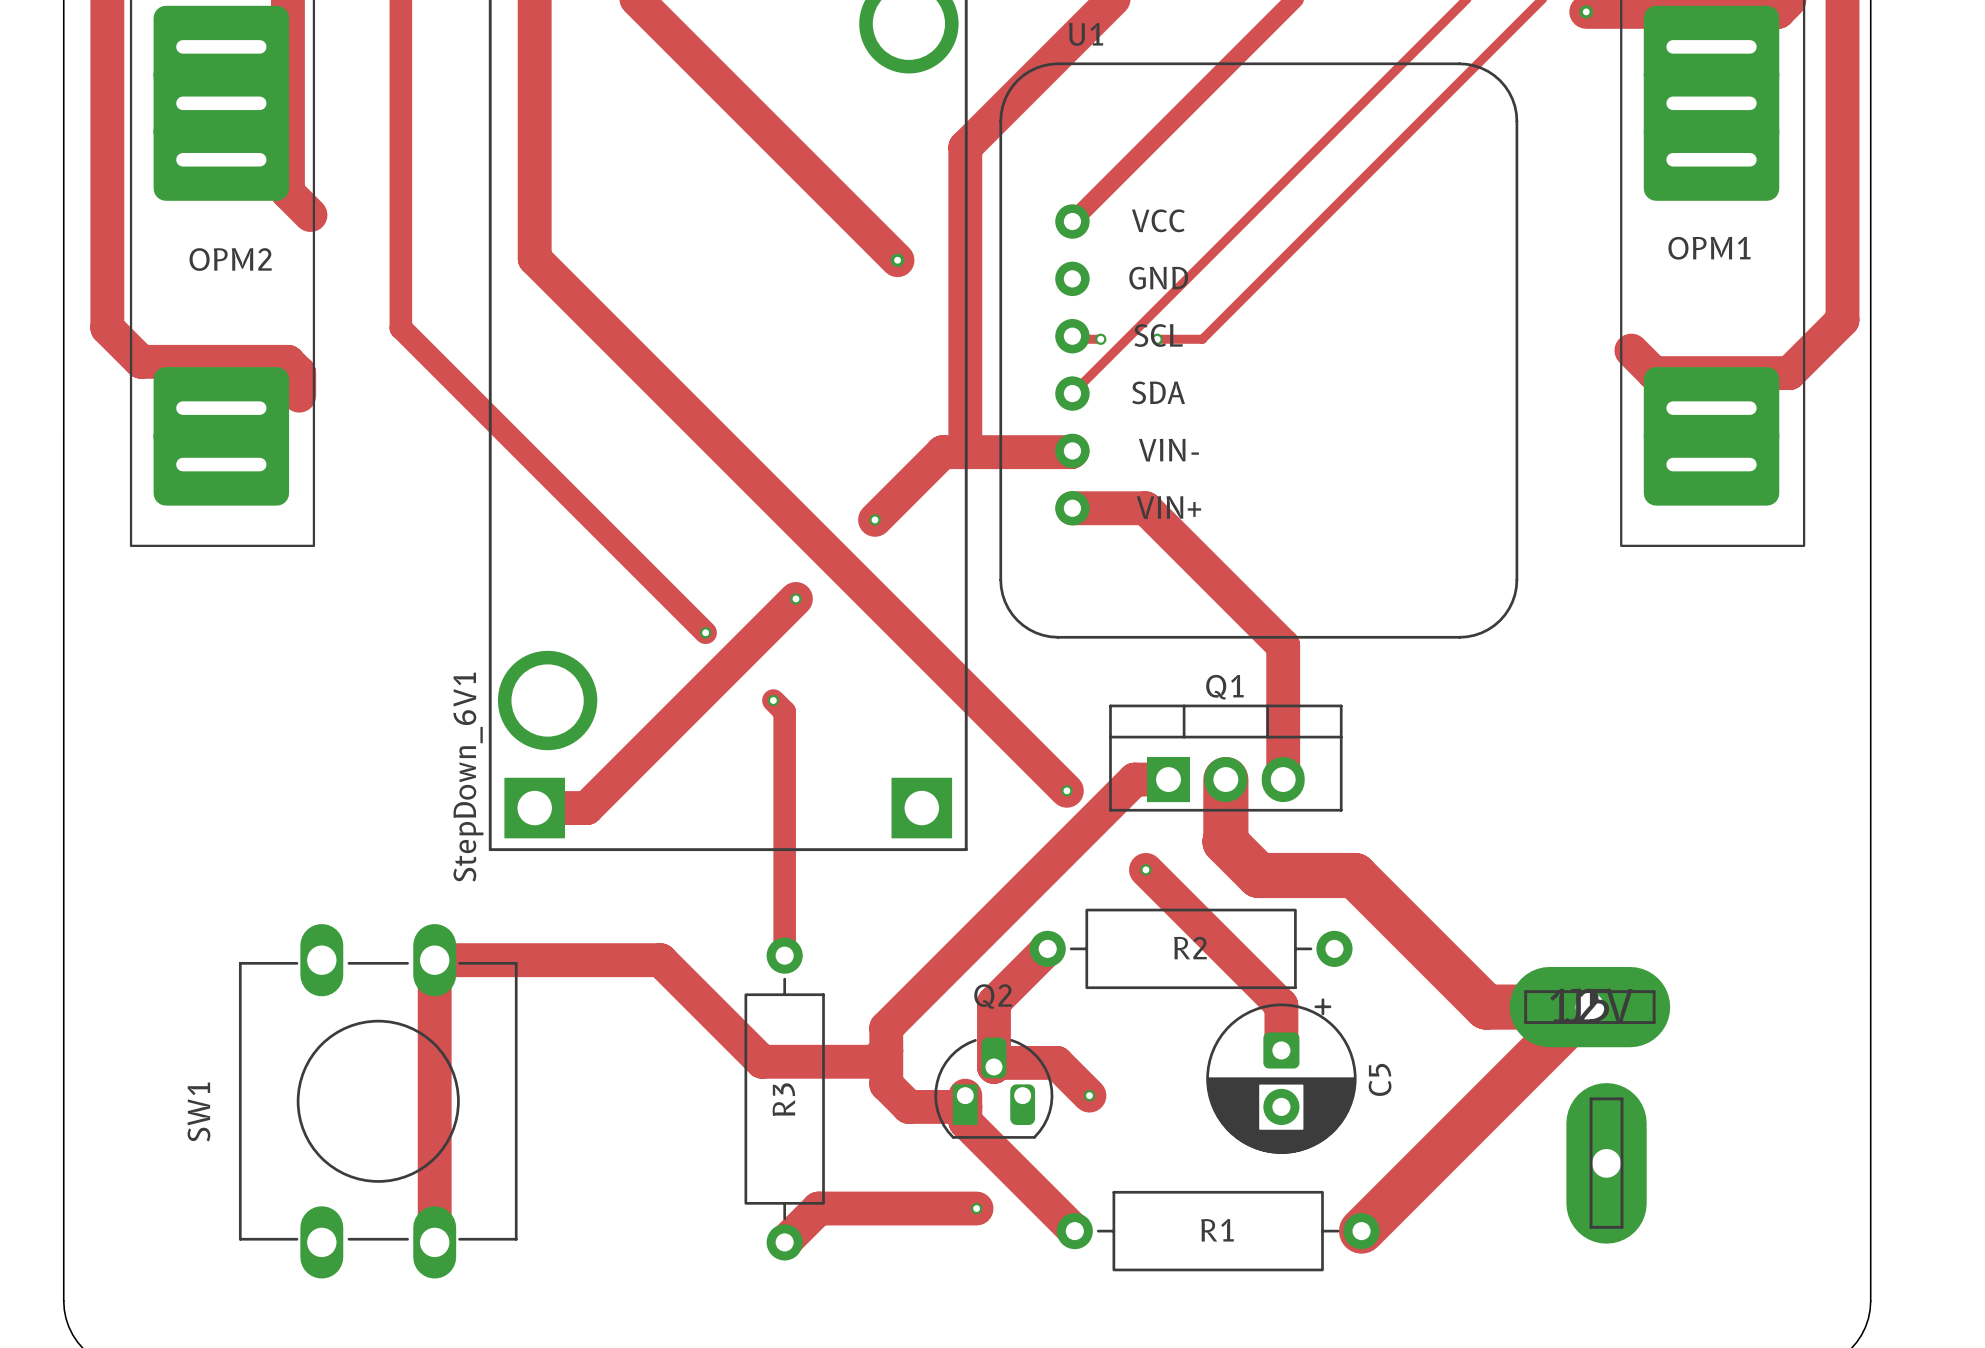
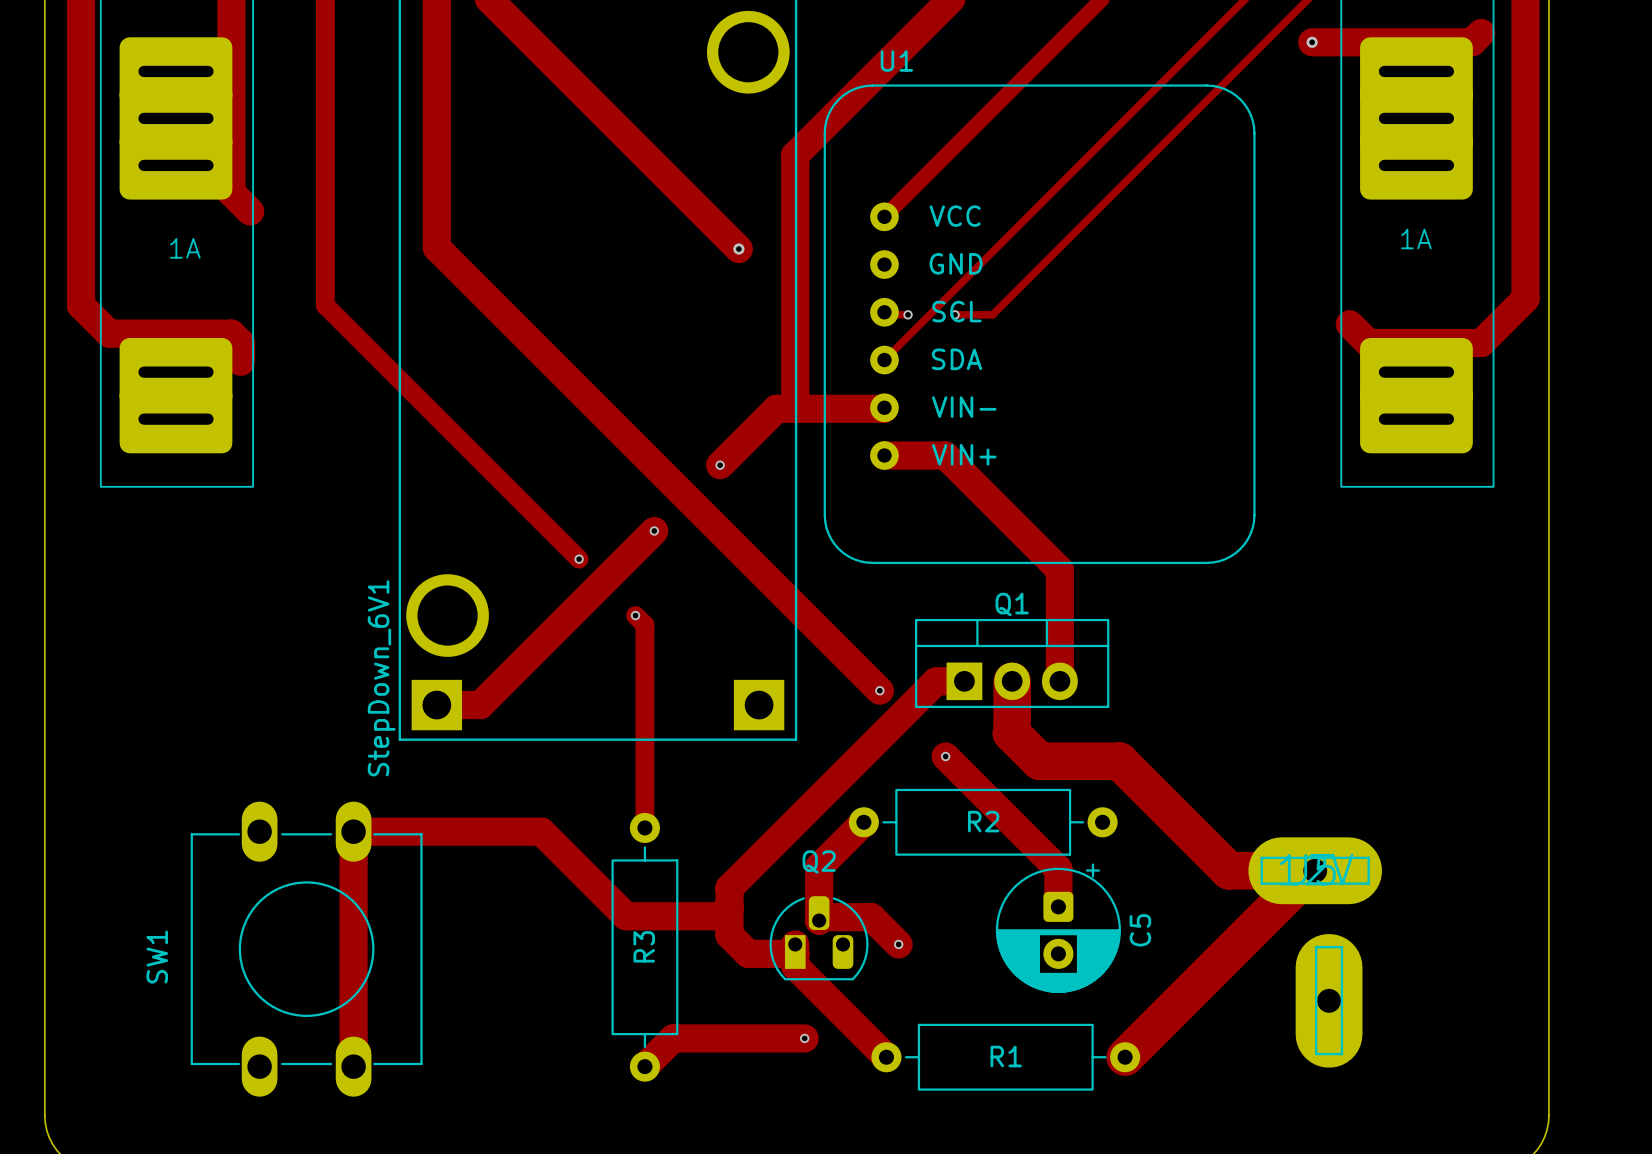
OPM1 name: OPM1 (1709, 248) -> 1A (1416, 238)
OPM2 name: OPM2 (230, 259) -> 1A (185, 248)

